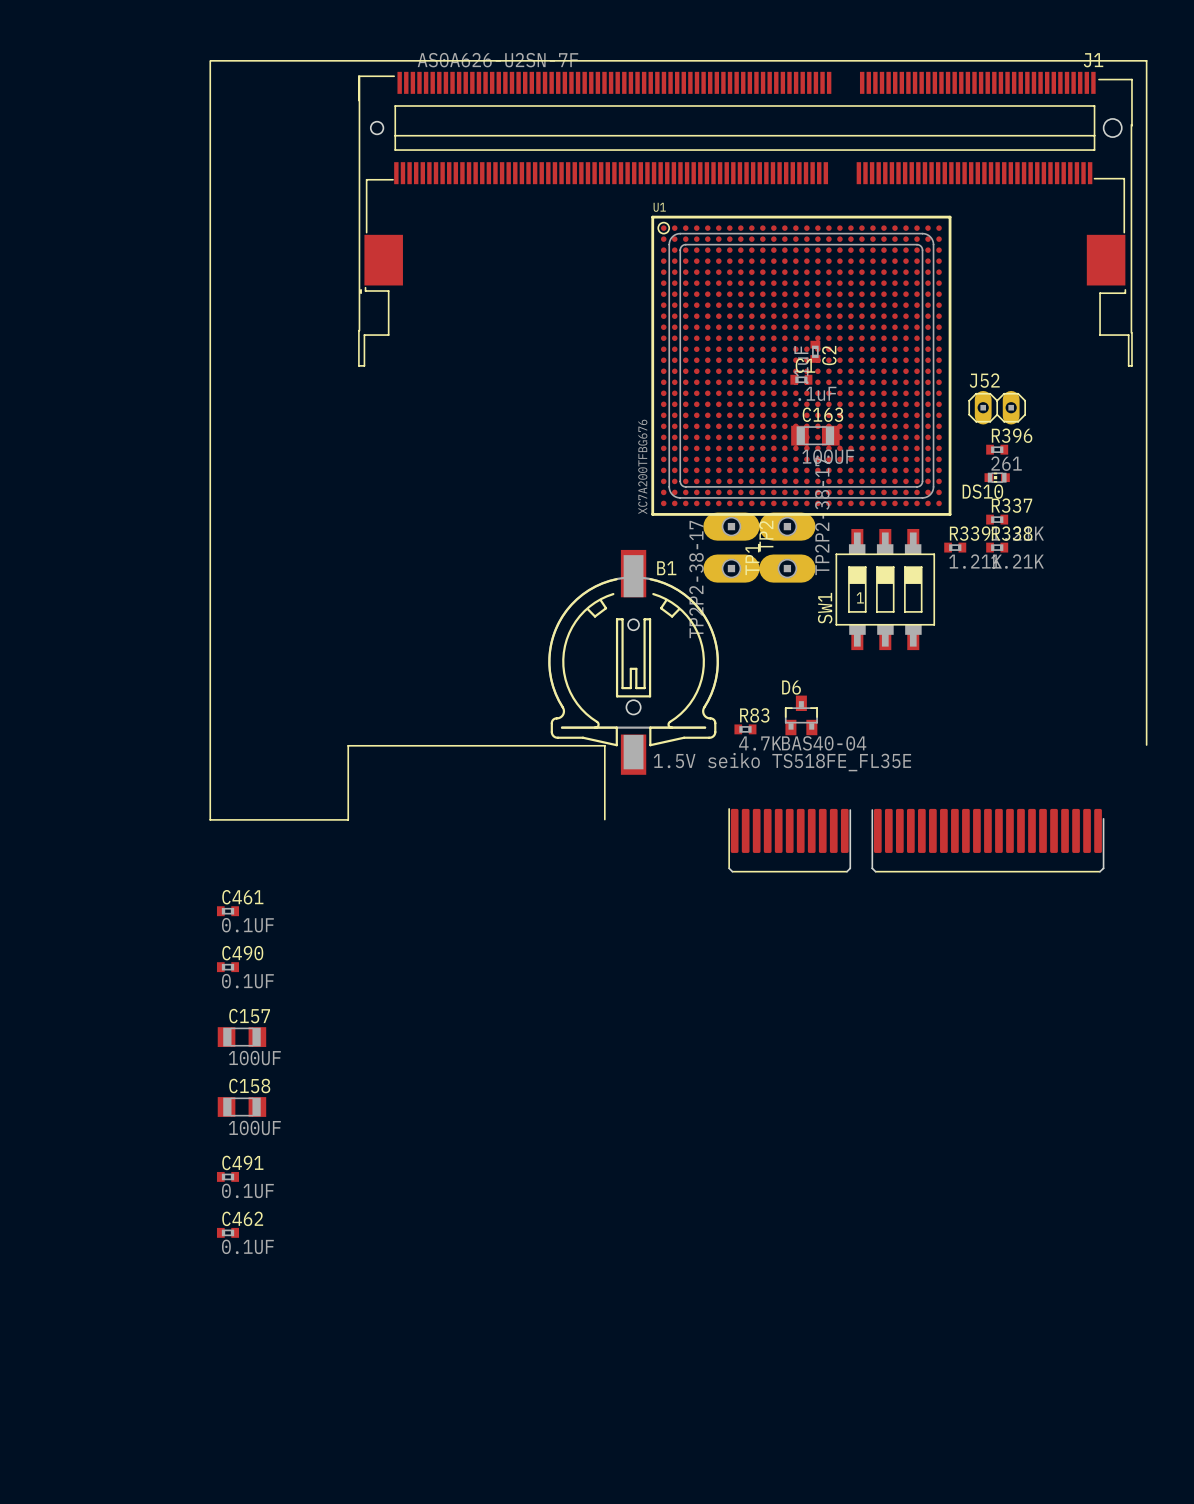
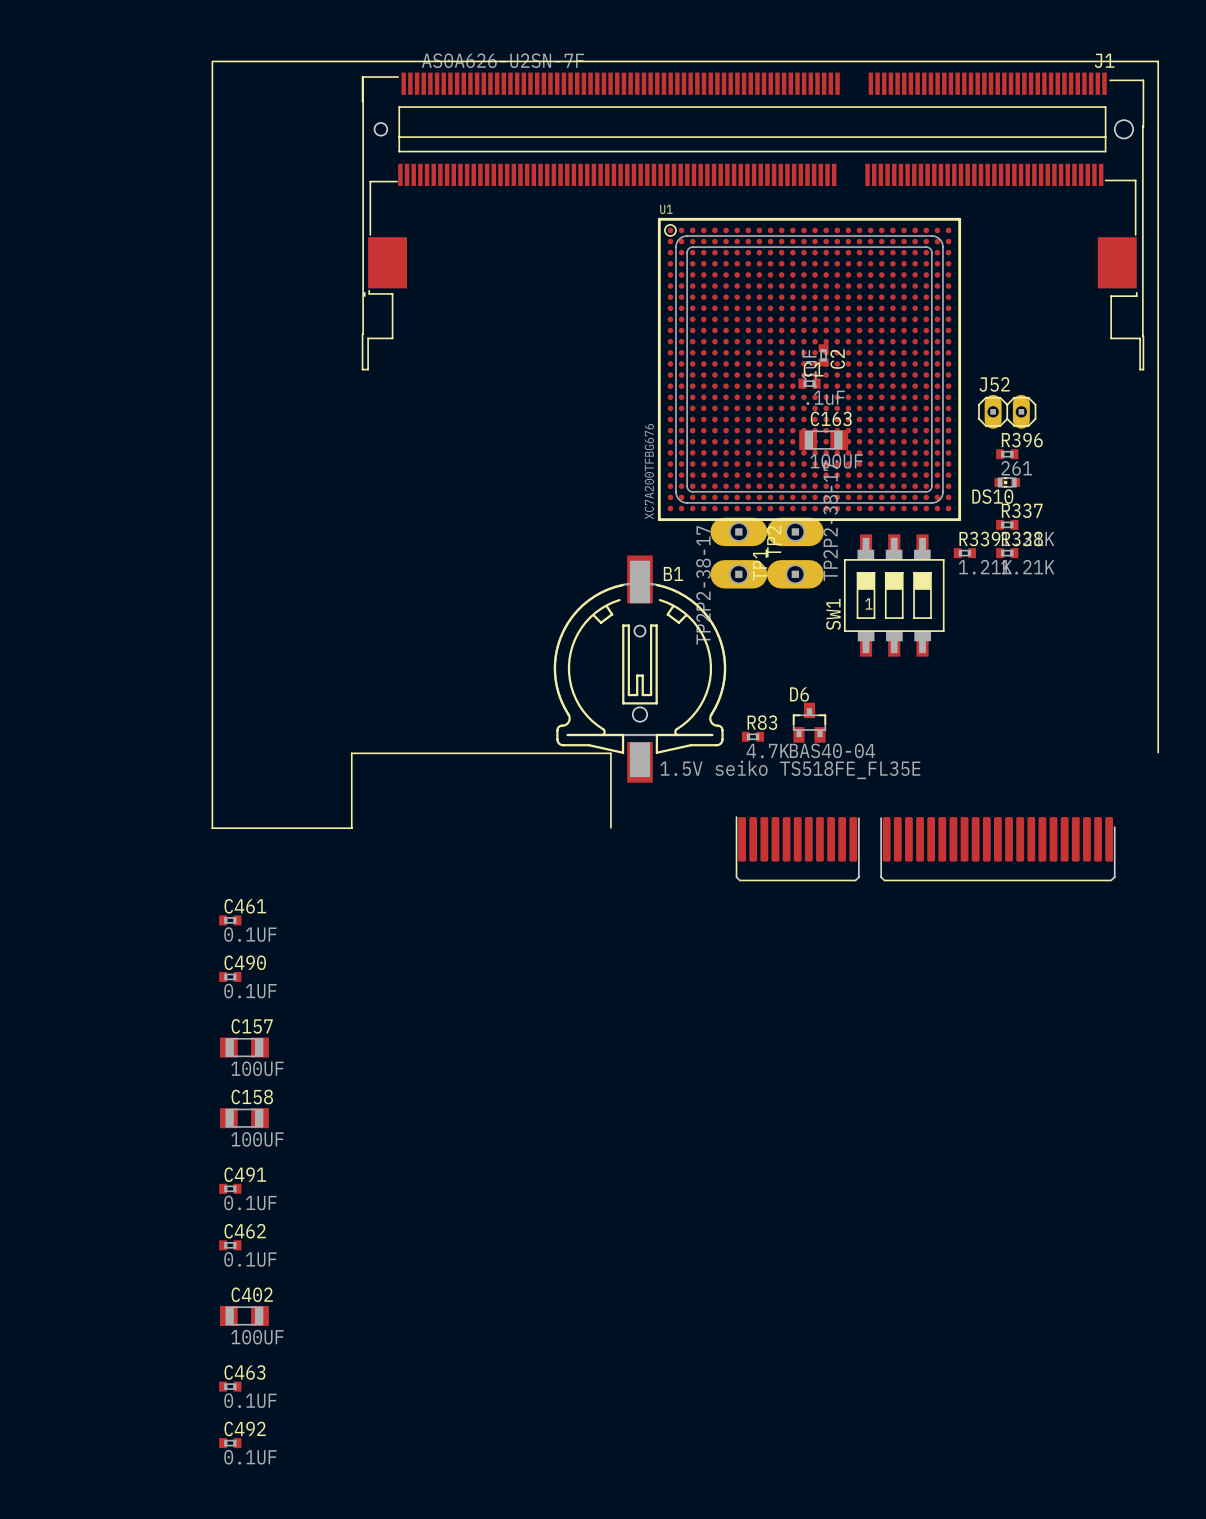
C402: none -> 100UF (244, 1315)
C463: none -> 0.1UF (230, 1386)
C492: none -> 0.1UF (230, 1443)

